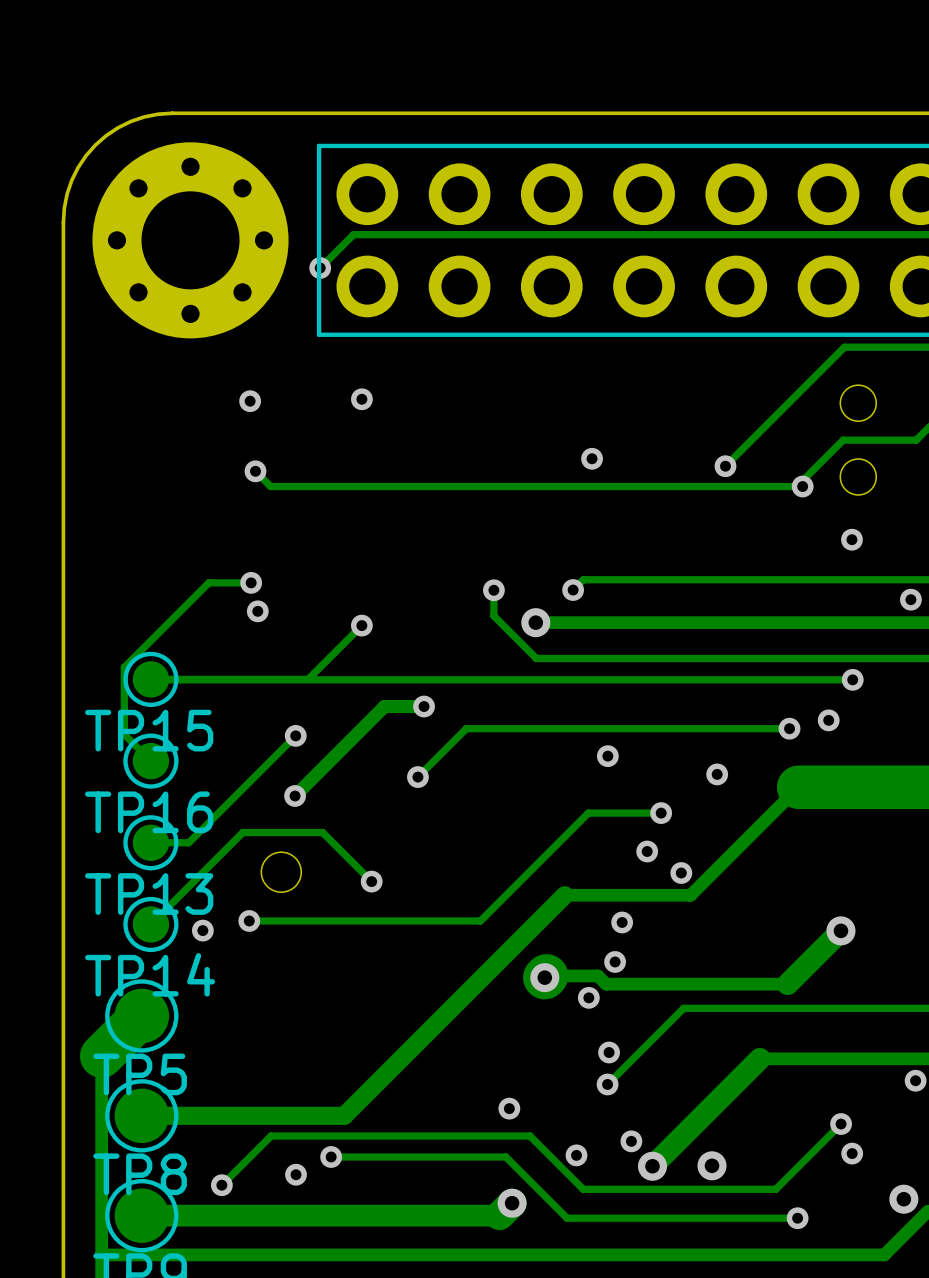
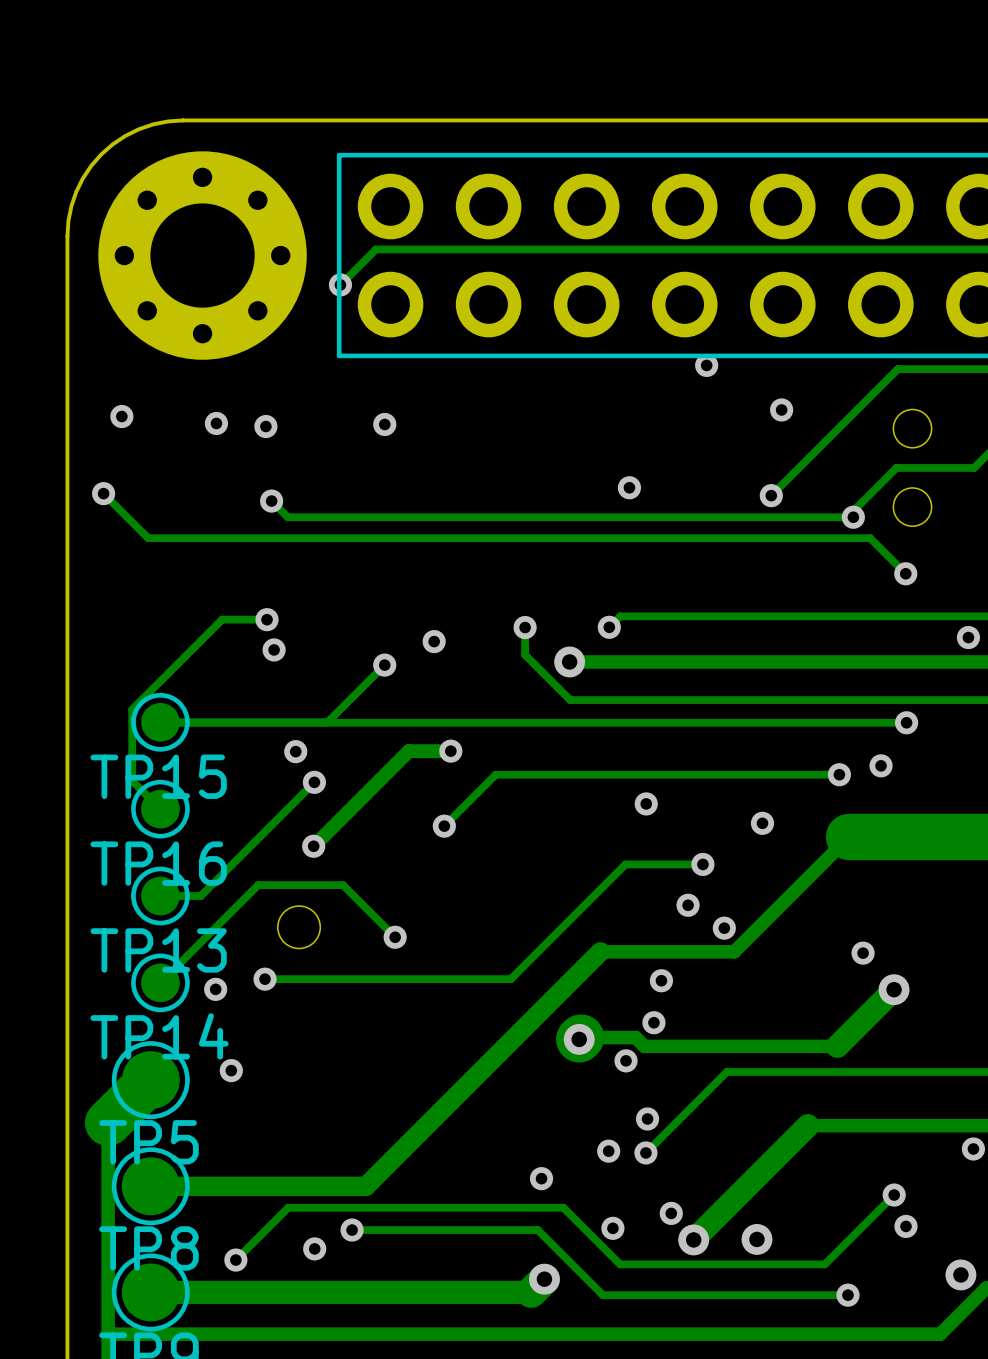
via: none -> (706, 365)
via: none -> (781, 409)
via: none -> (121, 416)
via: none -> (216, 423)
track: none -> (103, 493) (148, 538) (870, 538) (905, 573)
via: none -> (103, 493)
via: none -> (434, 641)
via: none -> (295, 751)
via: none -> (863, 953)
via: none -> (231, 1070)
via: none -> (608, 1151)

